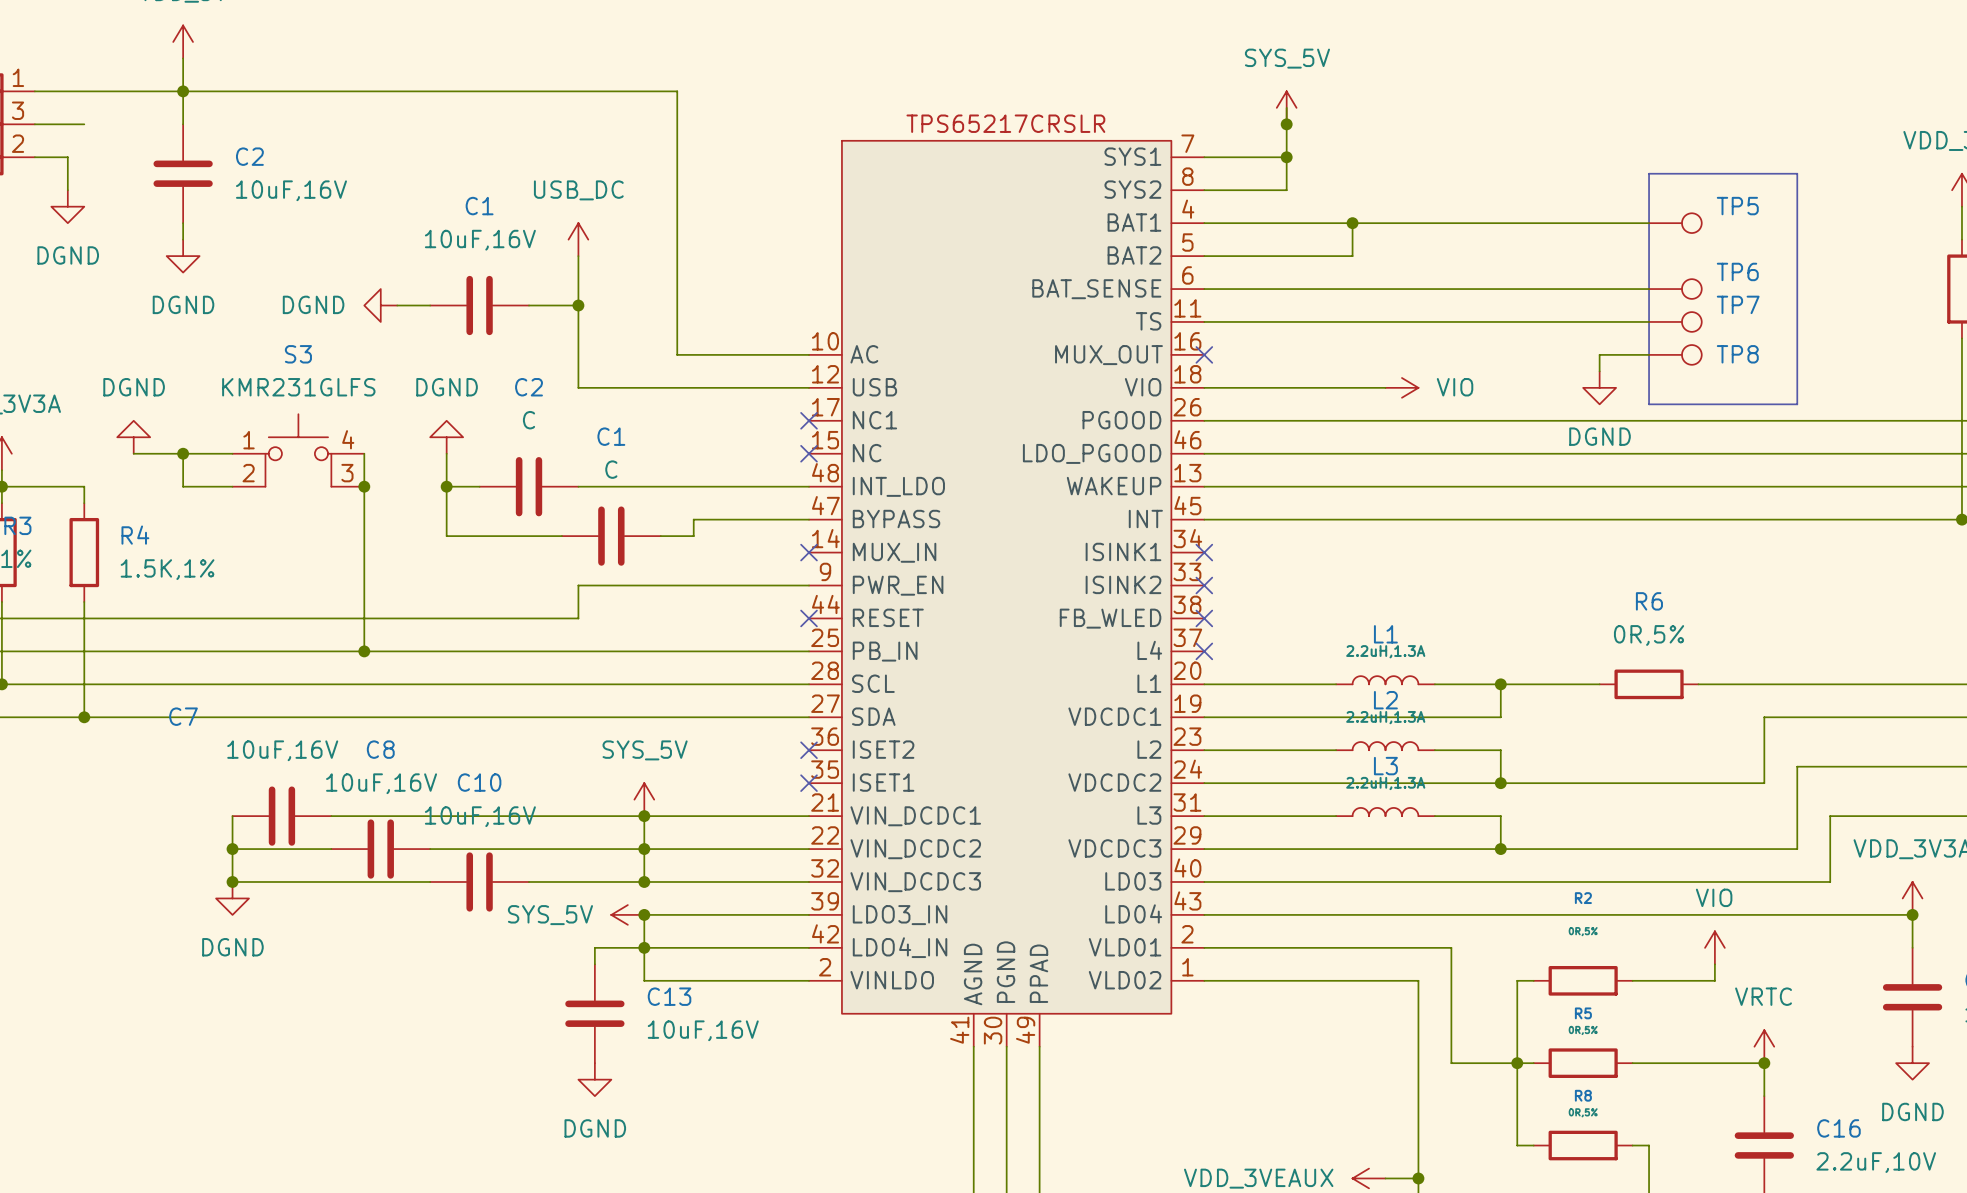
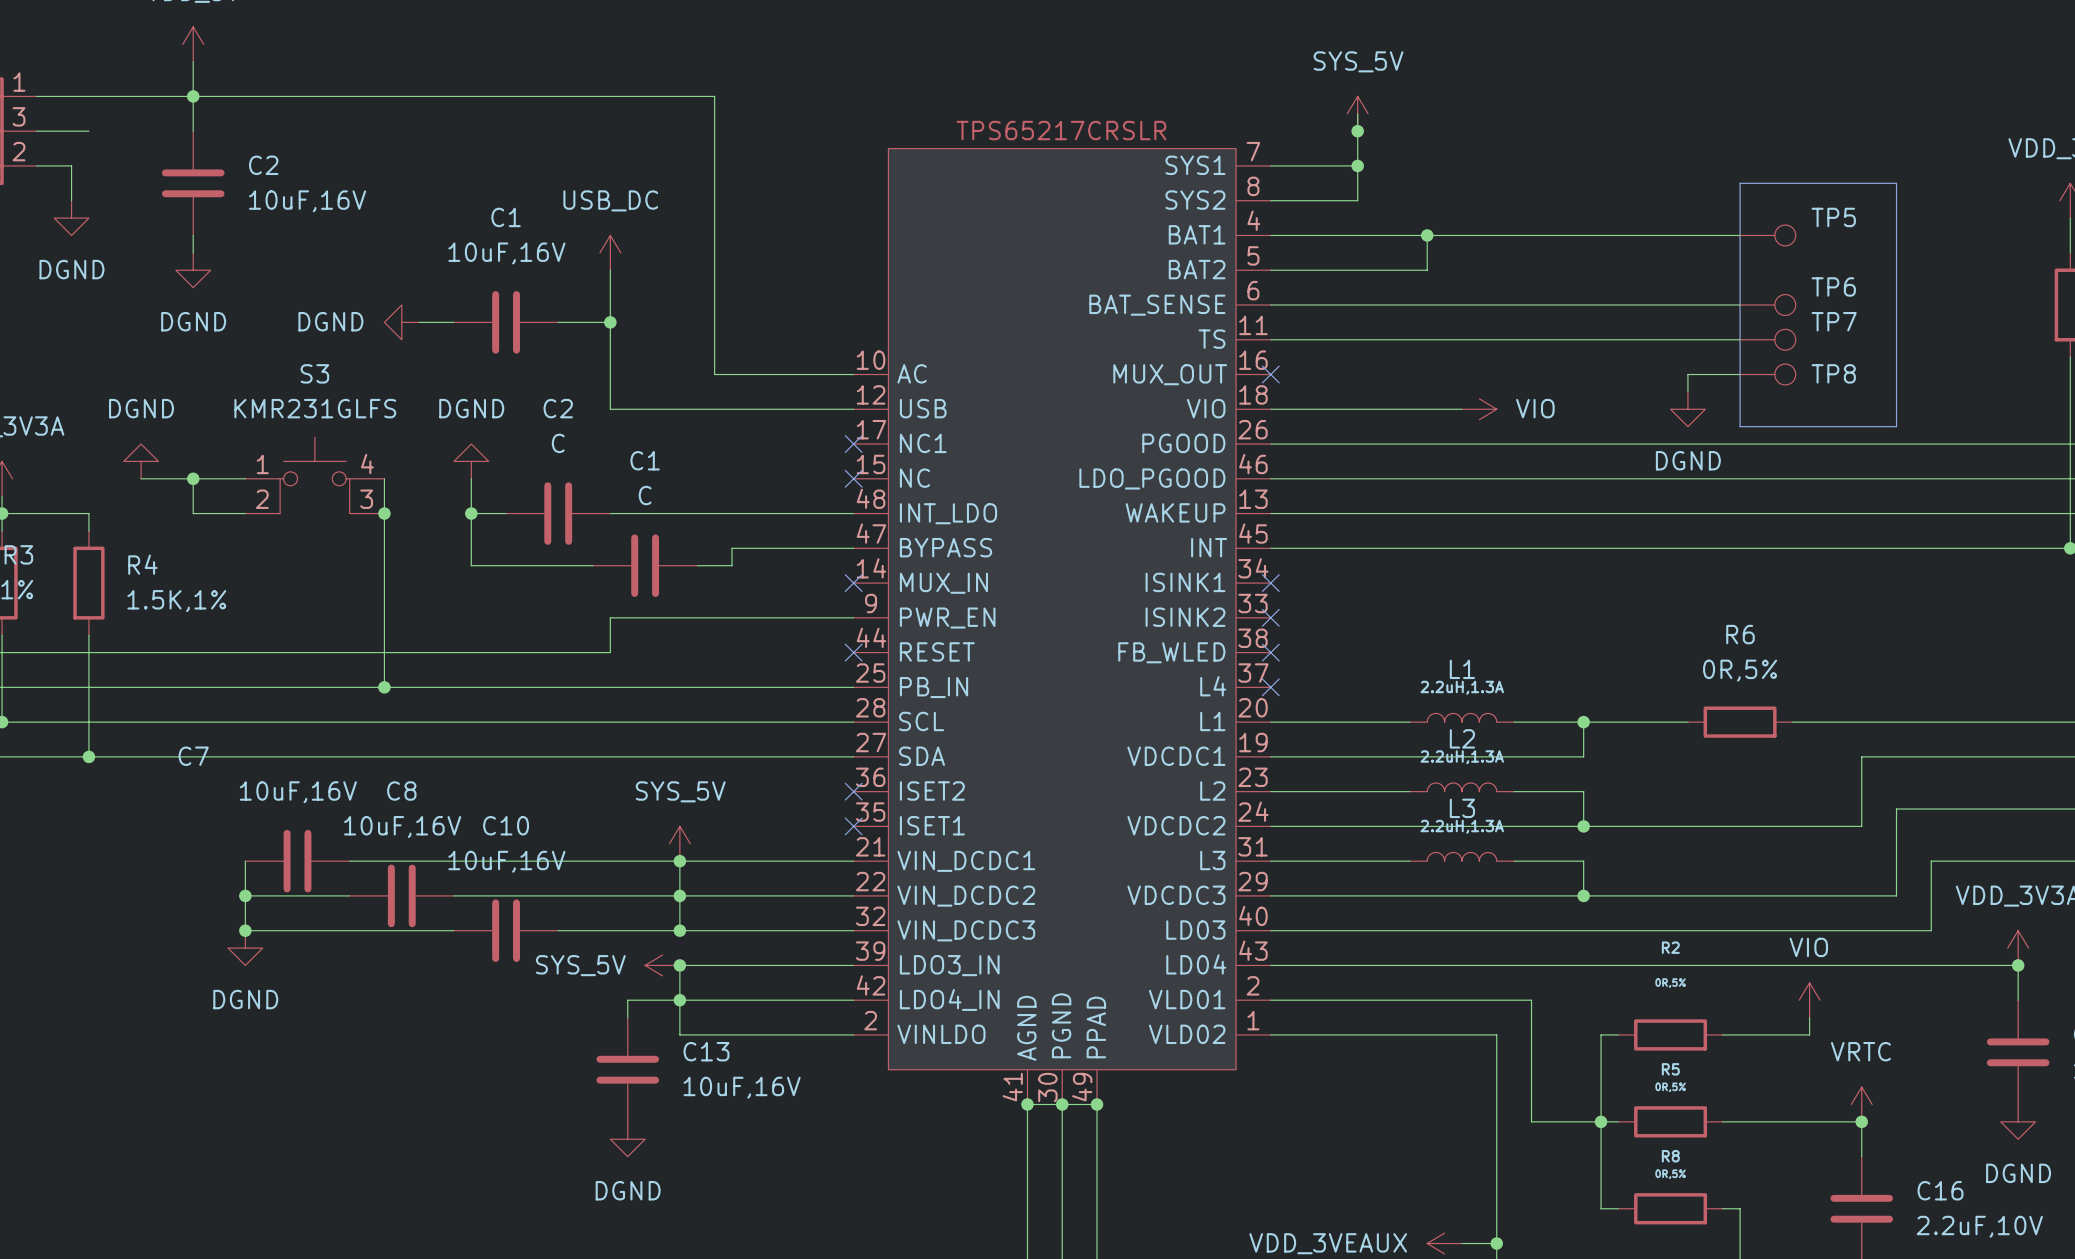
wire: none -> (1027, 1104) (1097, 1104)
junction: none -> (1027, 1104)
junction: none -> (1062, 1104)
junction: none -> (1097, 1104)

